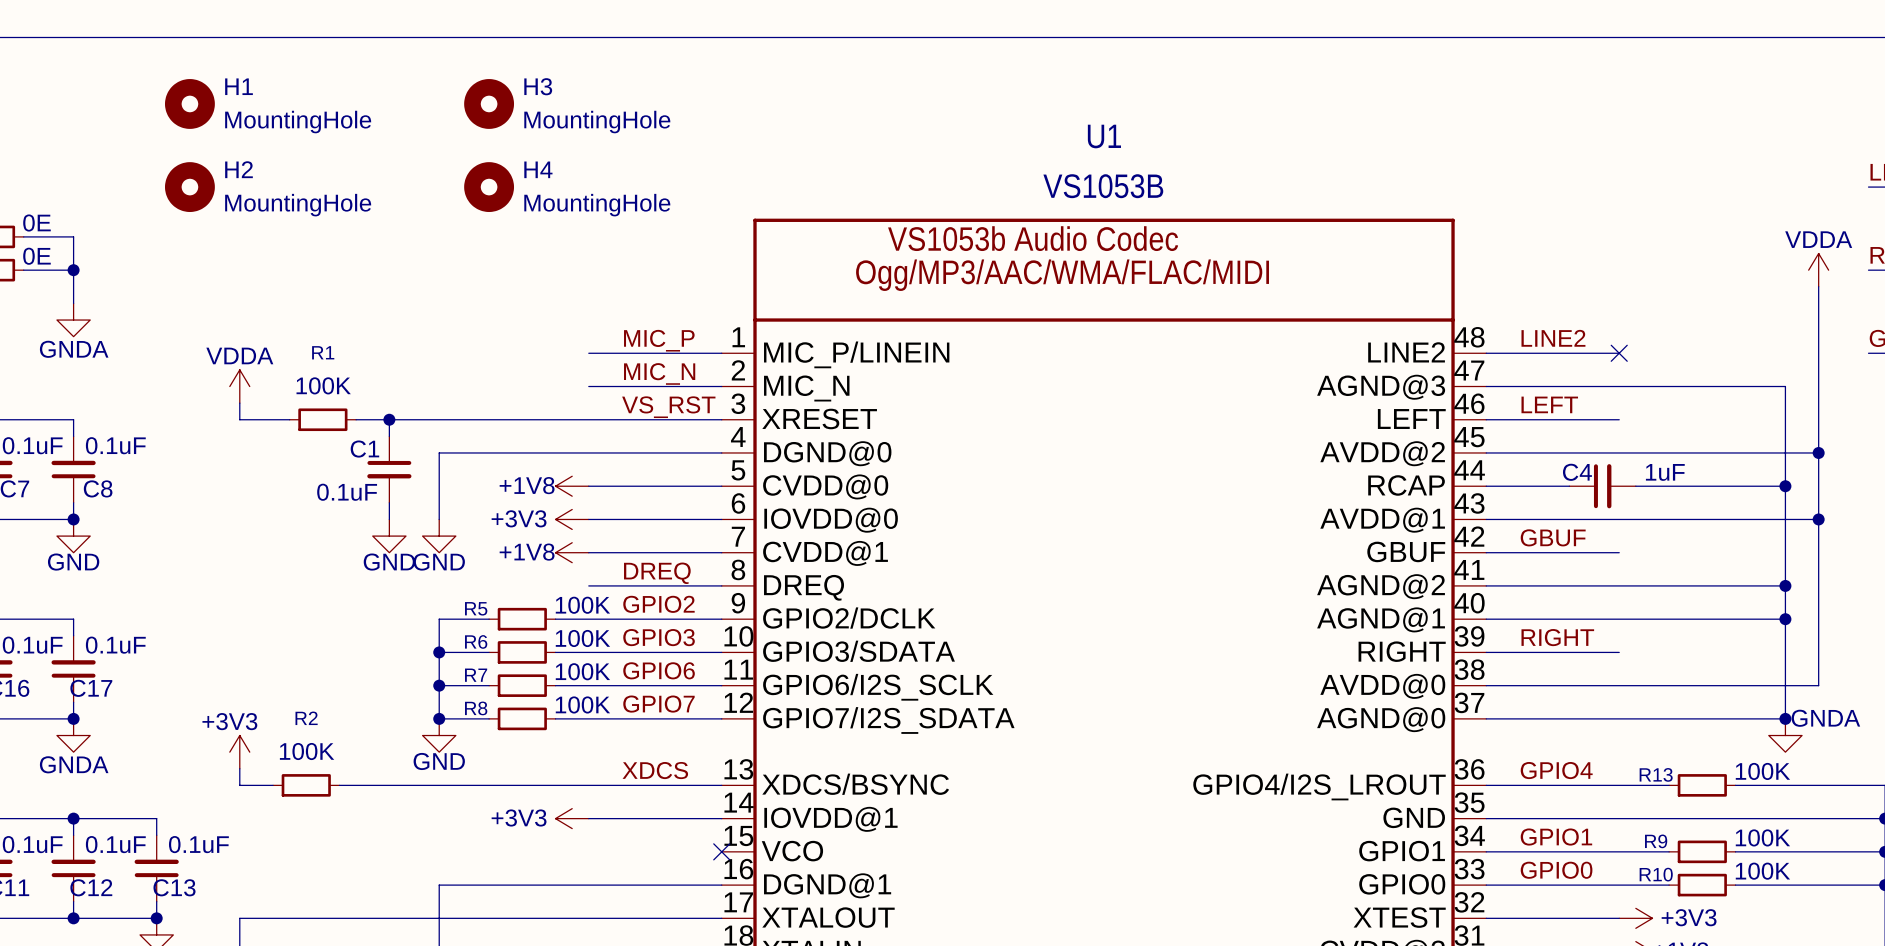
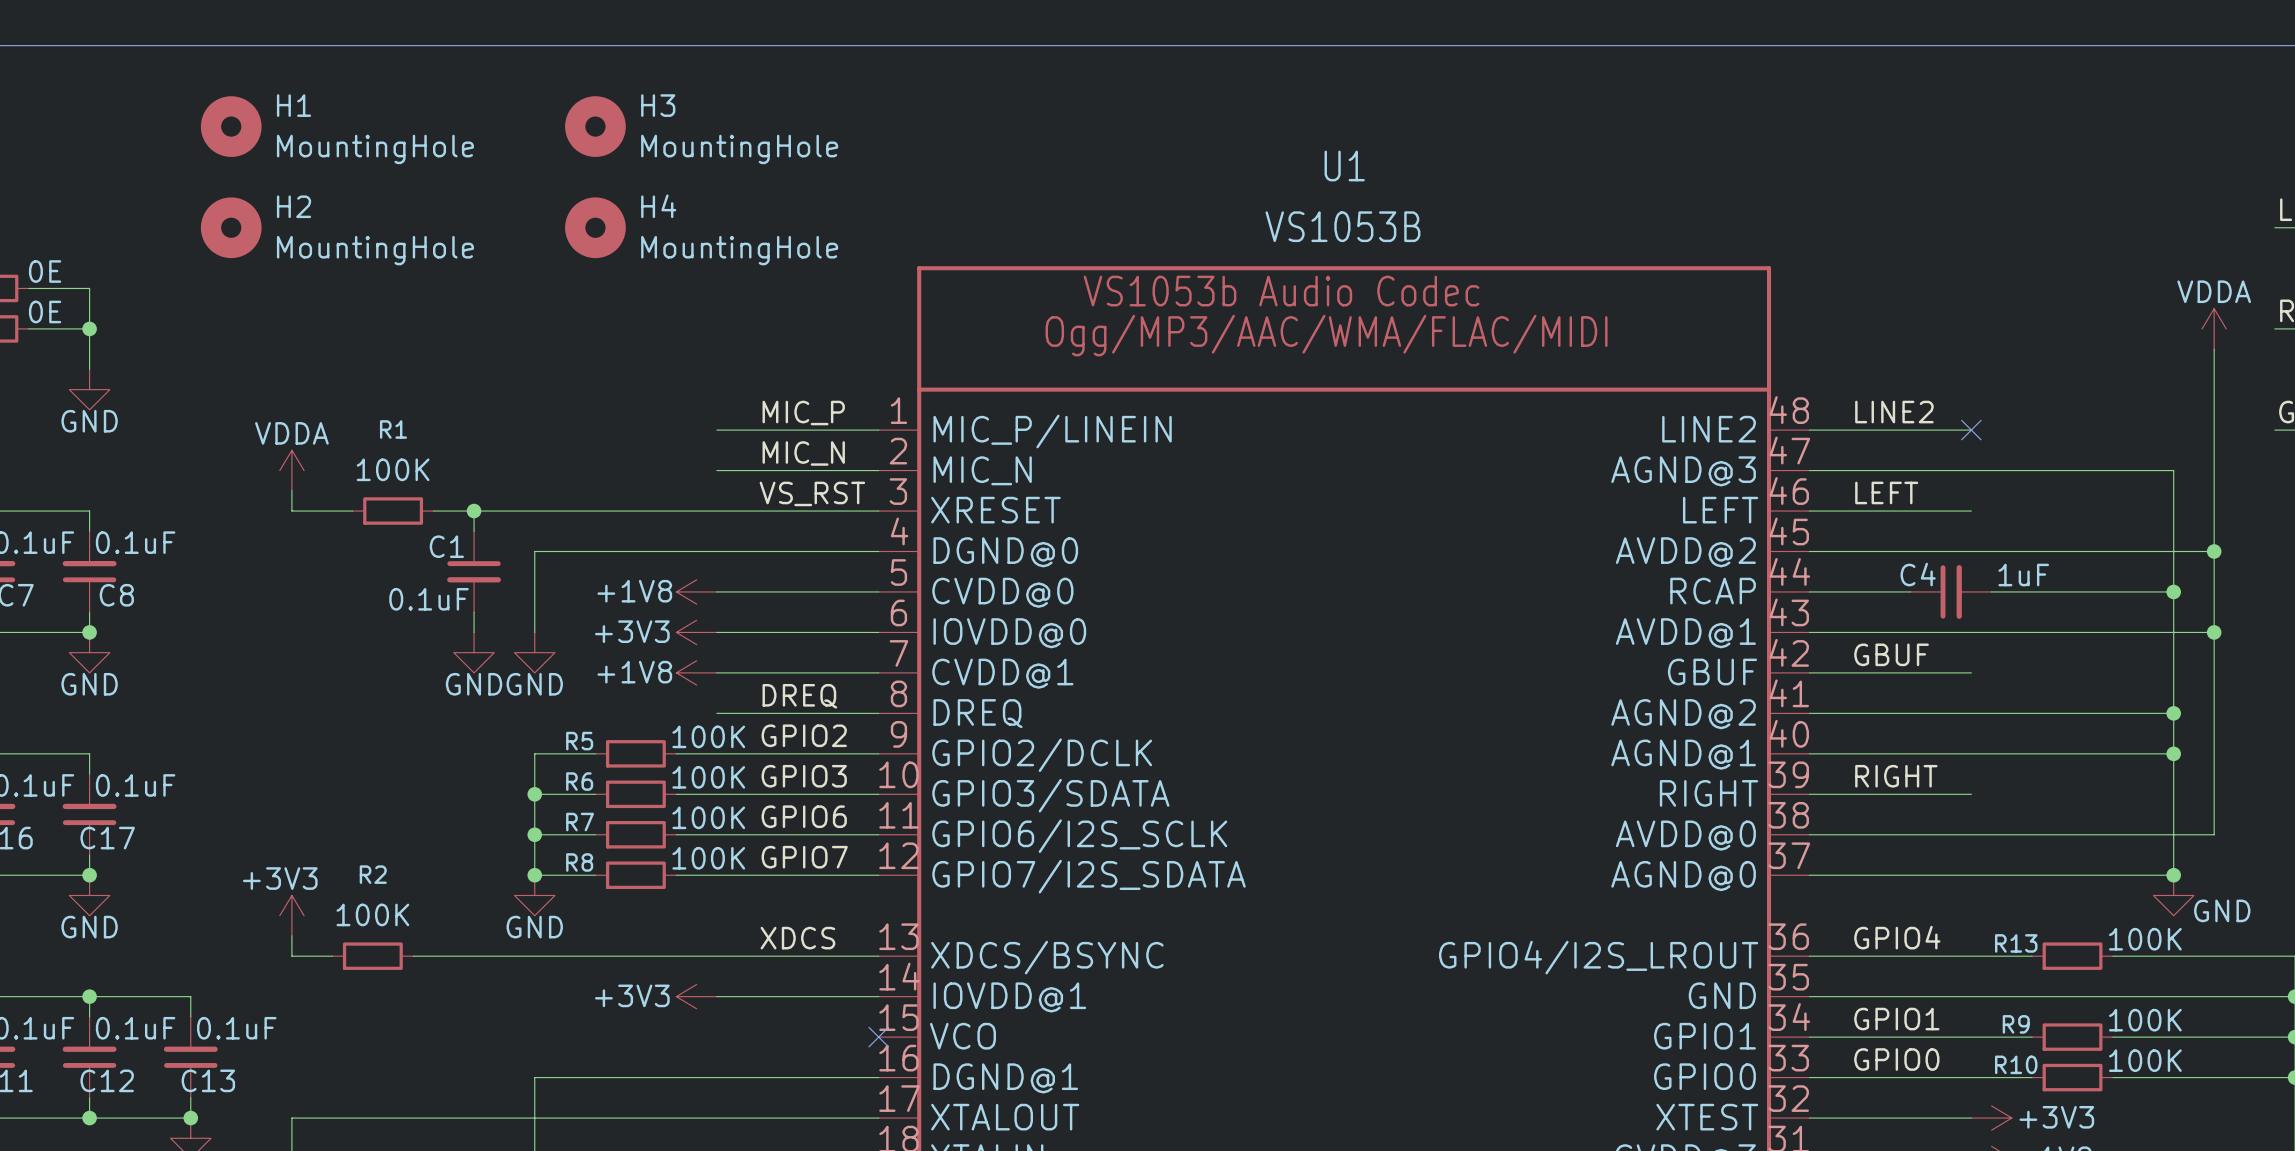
power symbol: GNDA (73, 320) -> GND (89, 389)
power symbol: GNDA (73, 735) -> GND (89, 895)
power symbol: GNDA (1785, 735) -> GND (2173, 895)

